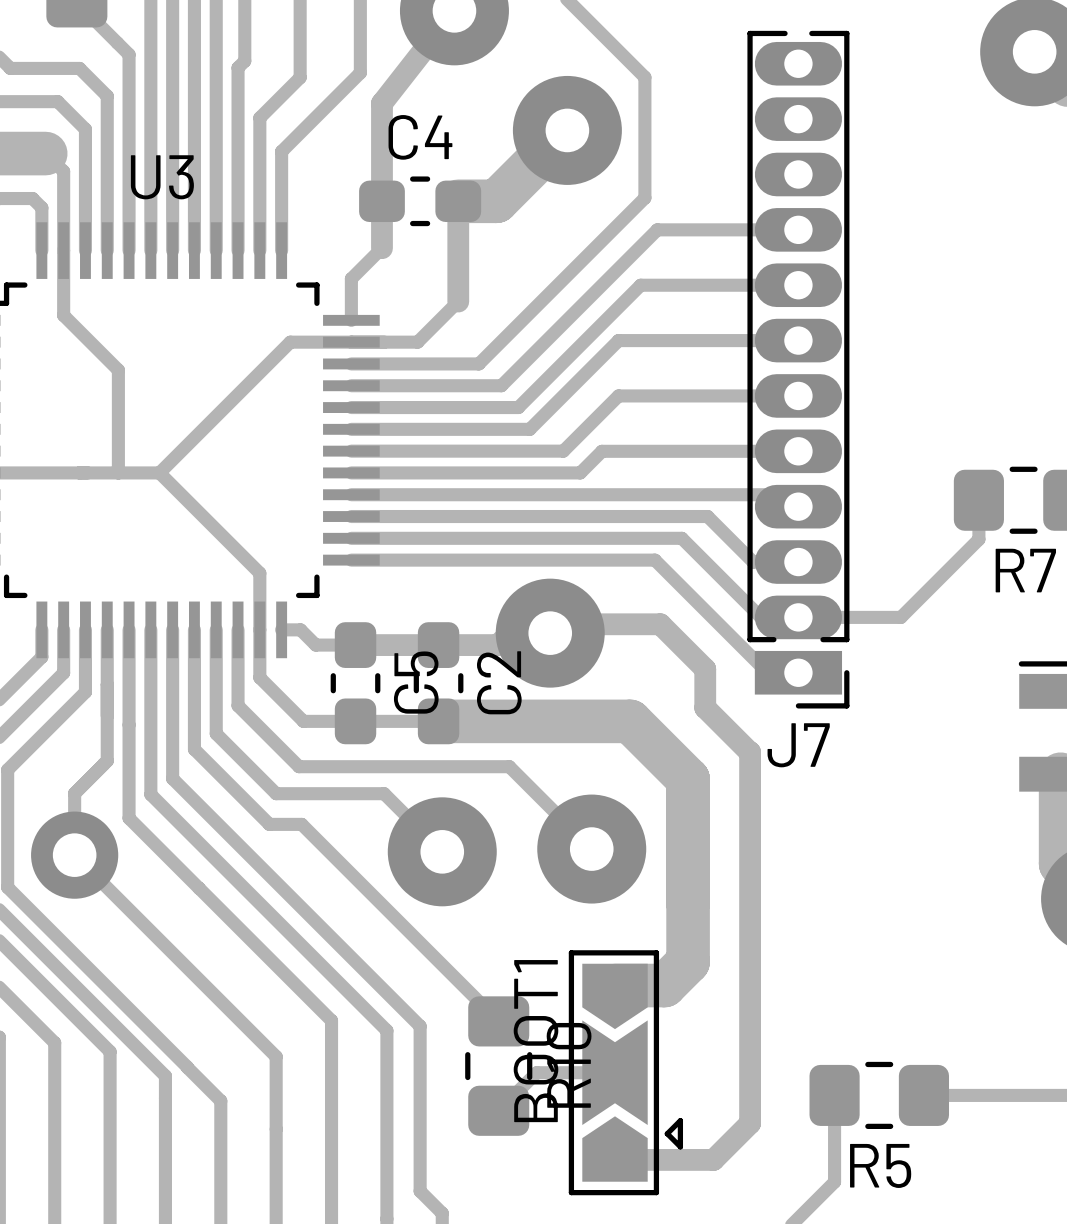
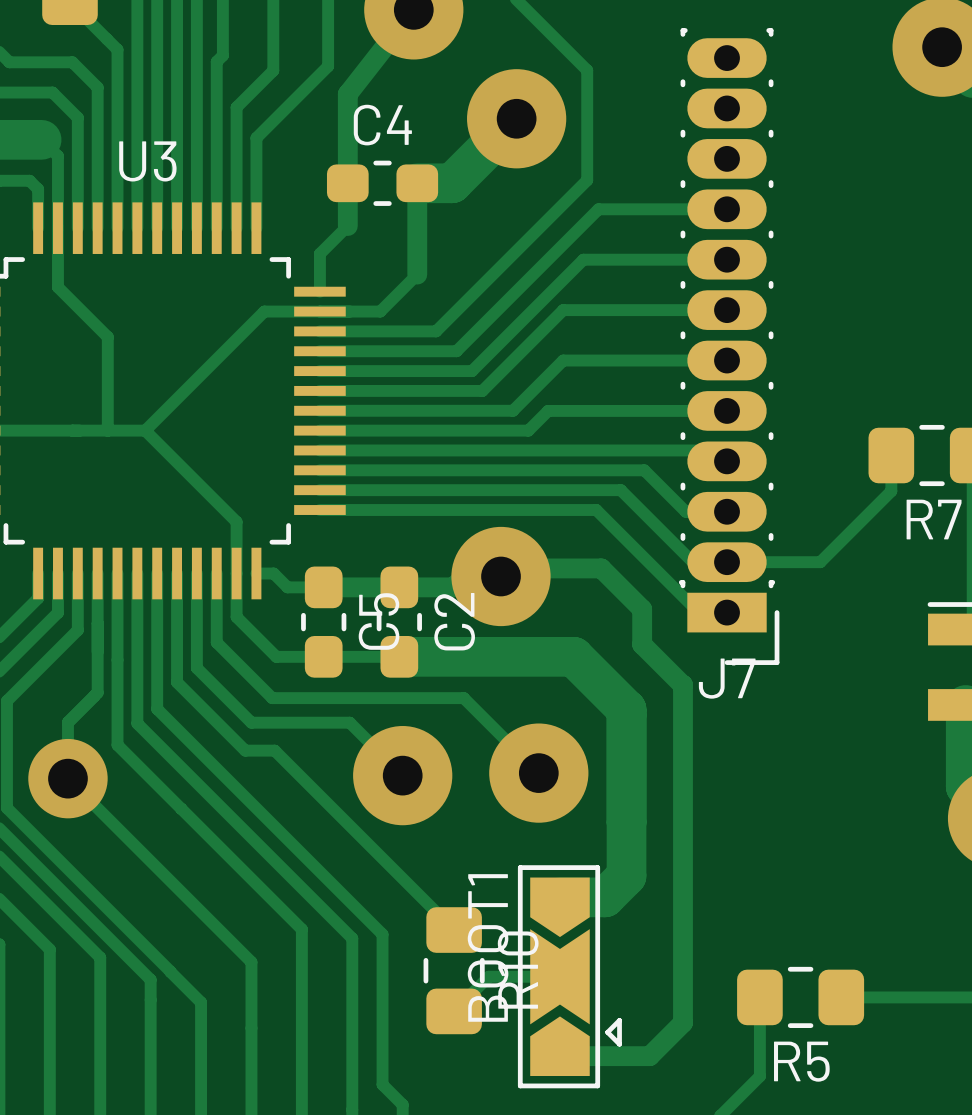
J7 footprint: [747, 30, 850, 709] -> [678, 28, 780, 665]

